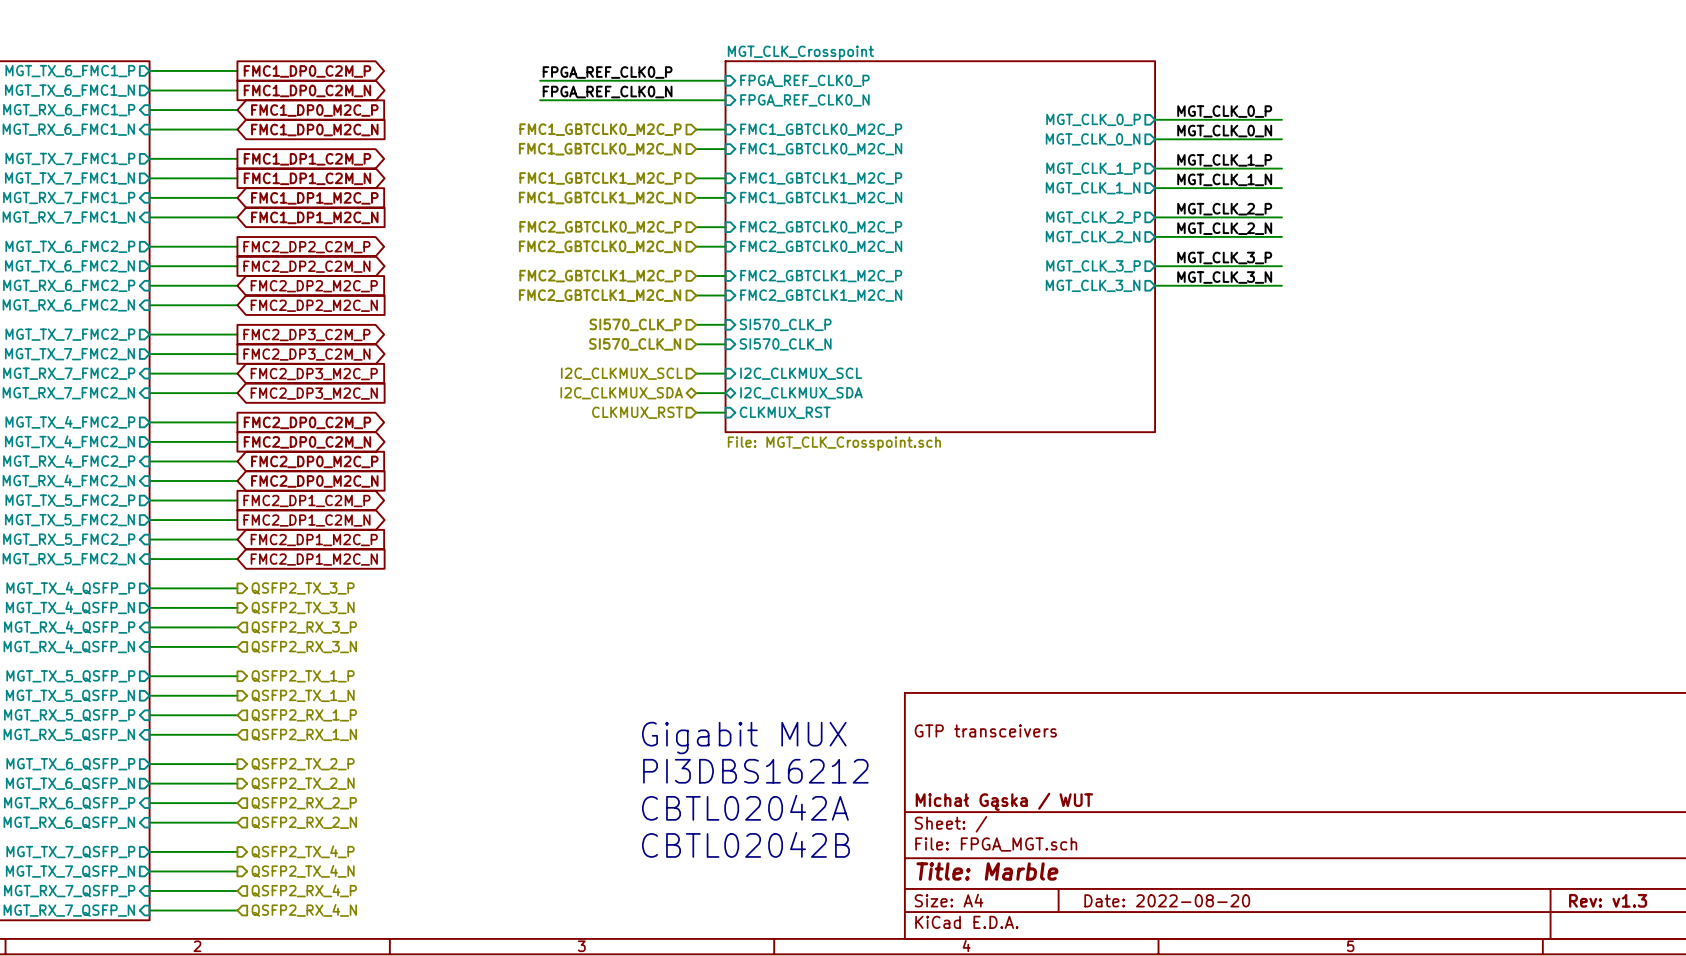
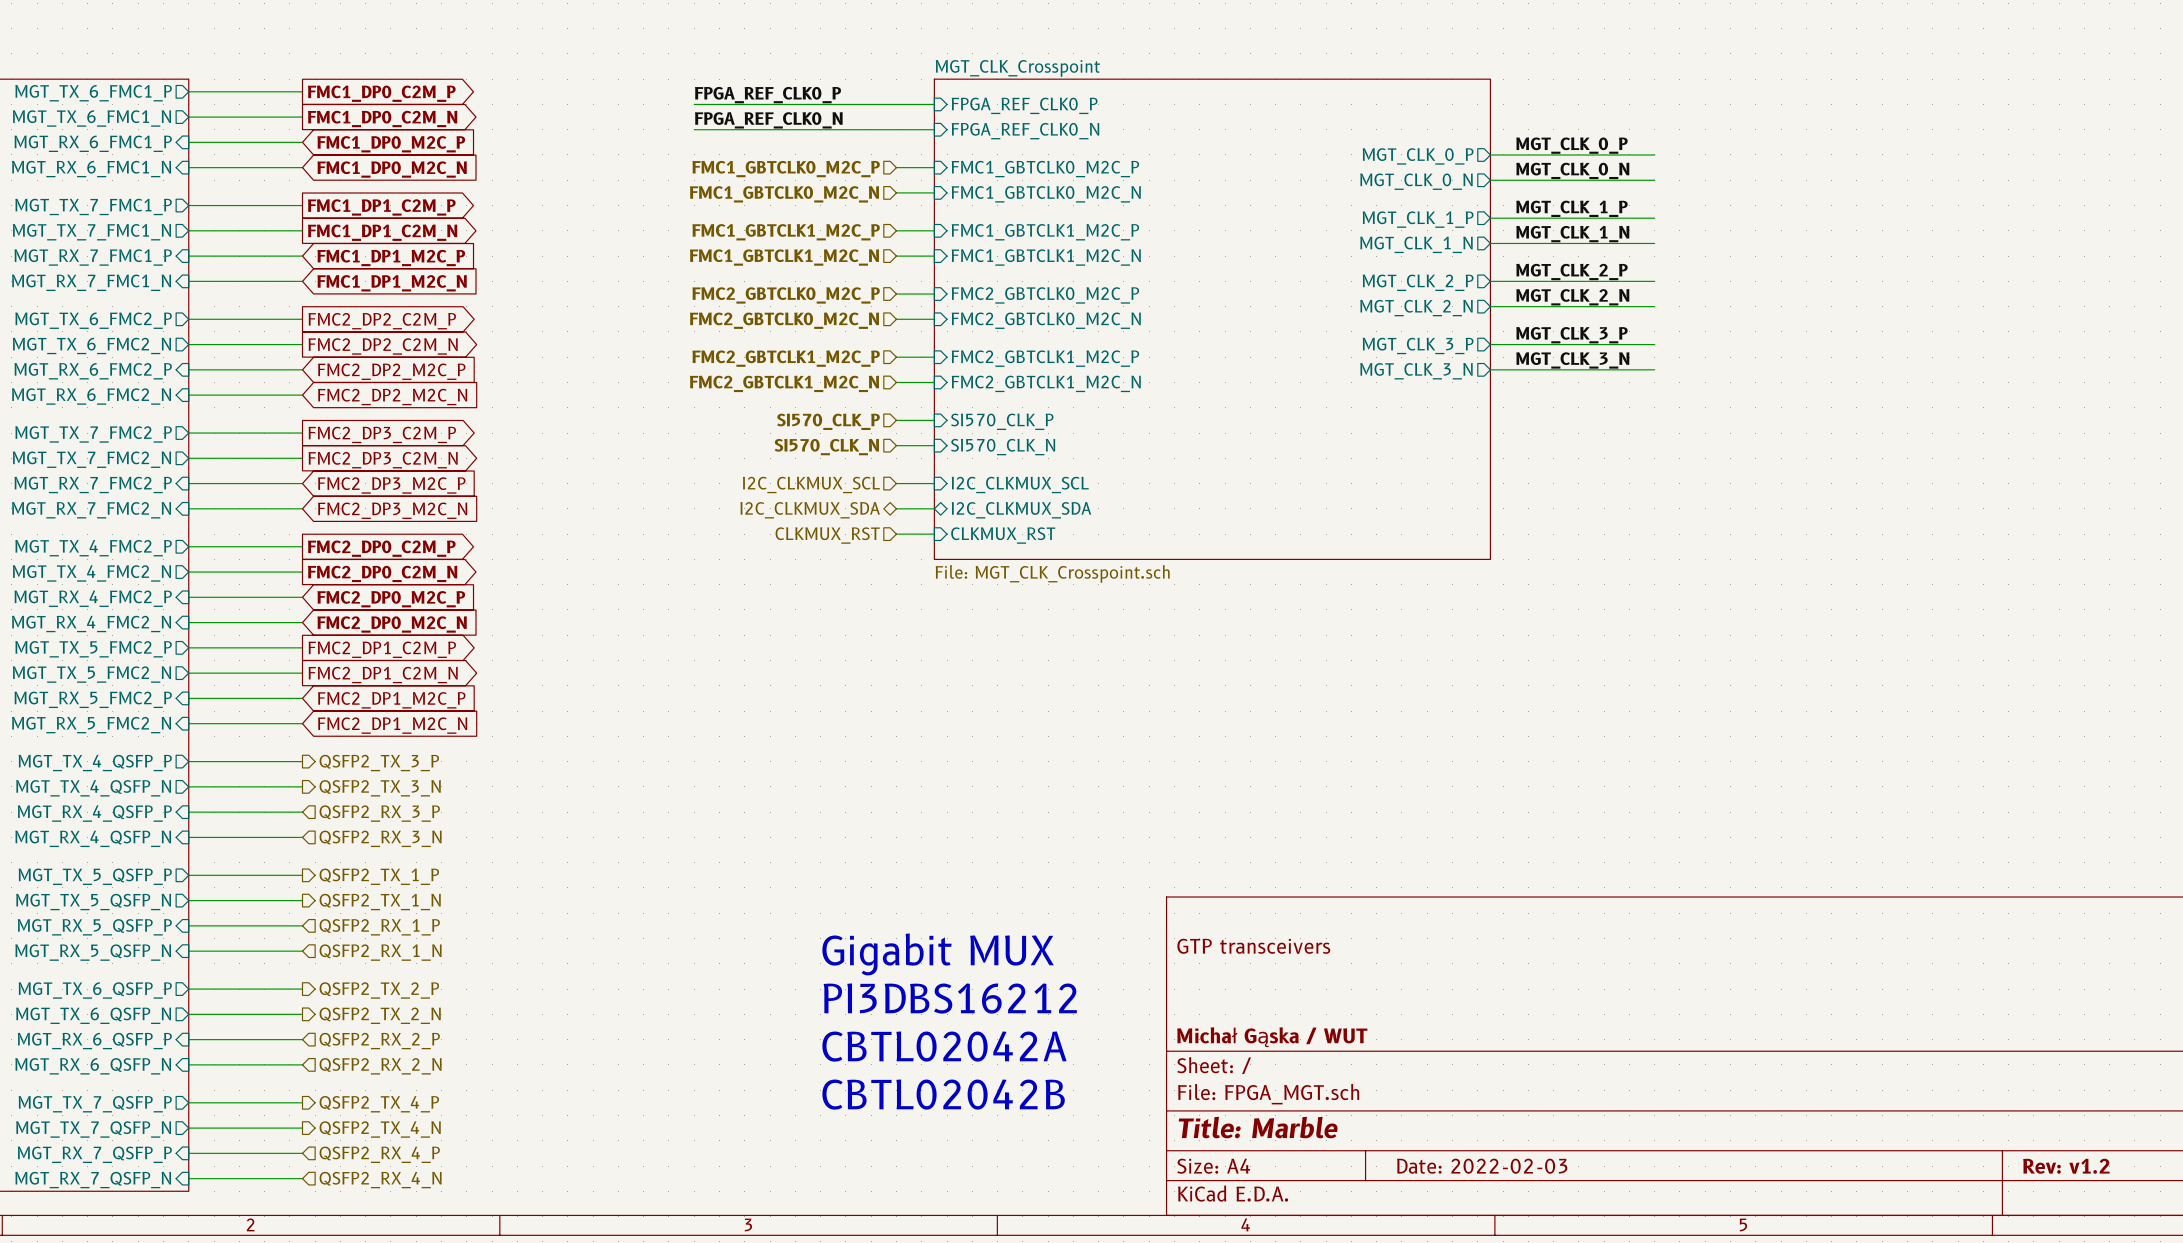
title block: Date: 2022-08-20 (1167, 900) -> Date: 2022-02-03 (1482, 1166)
title block: Rev: v1.3 (1608, 900) -> Rev: v1.2 (2066, 1166)

